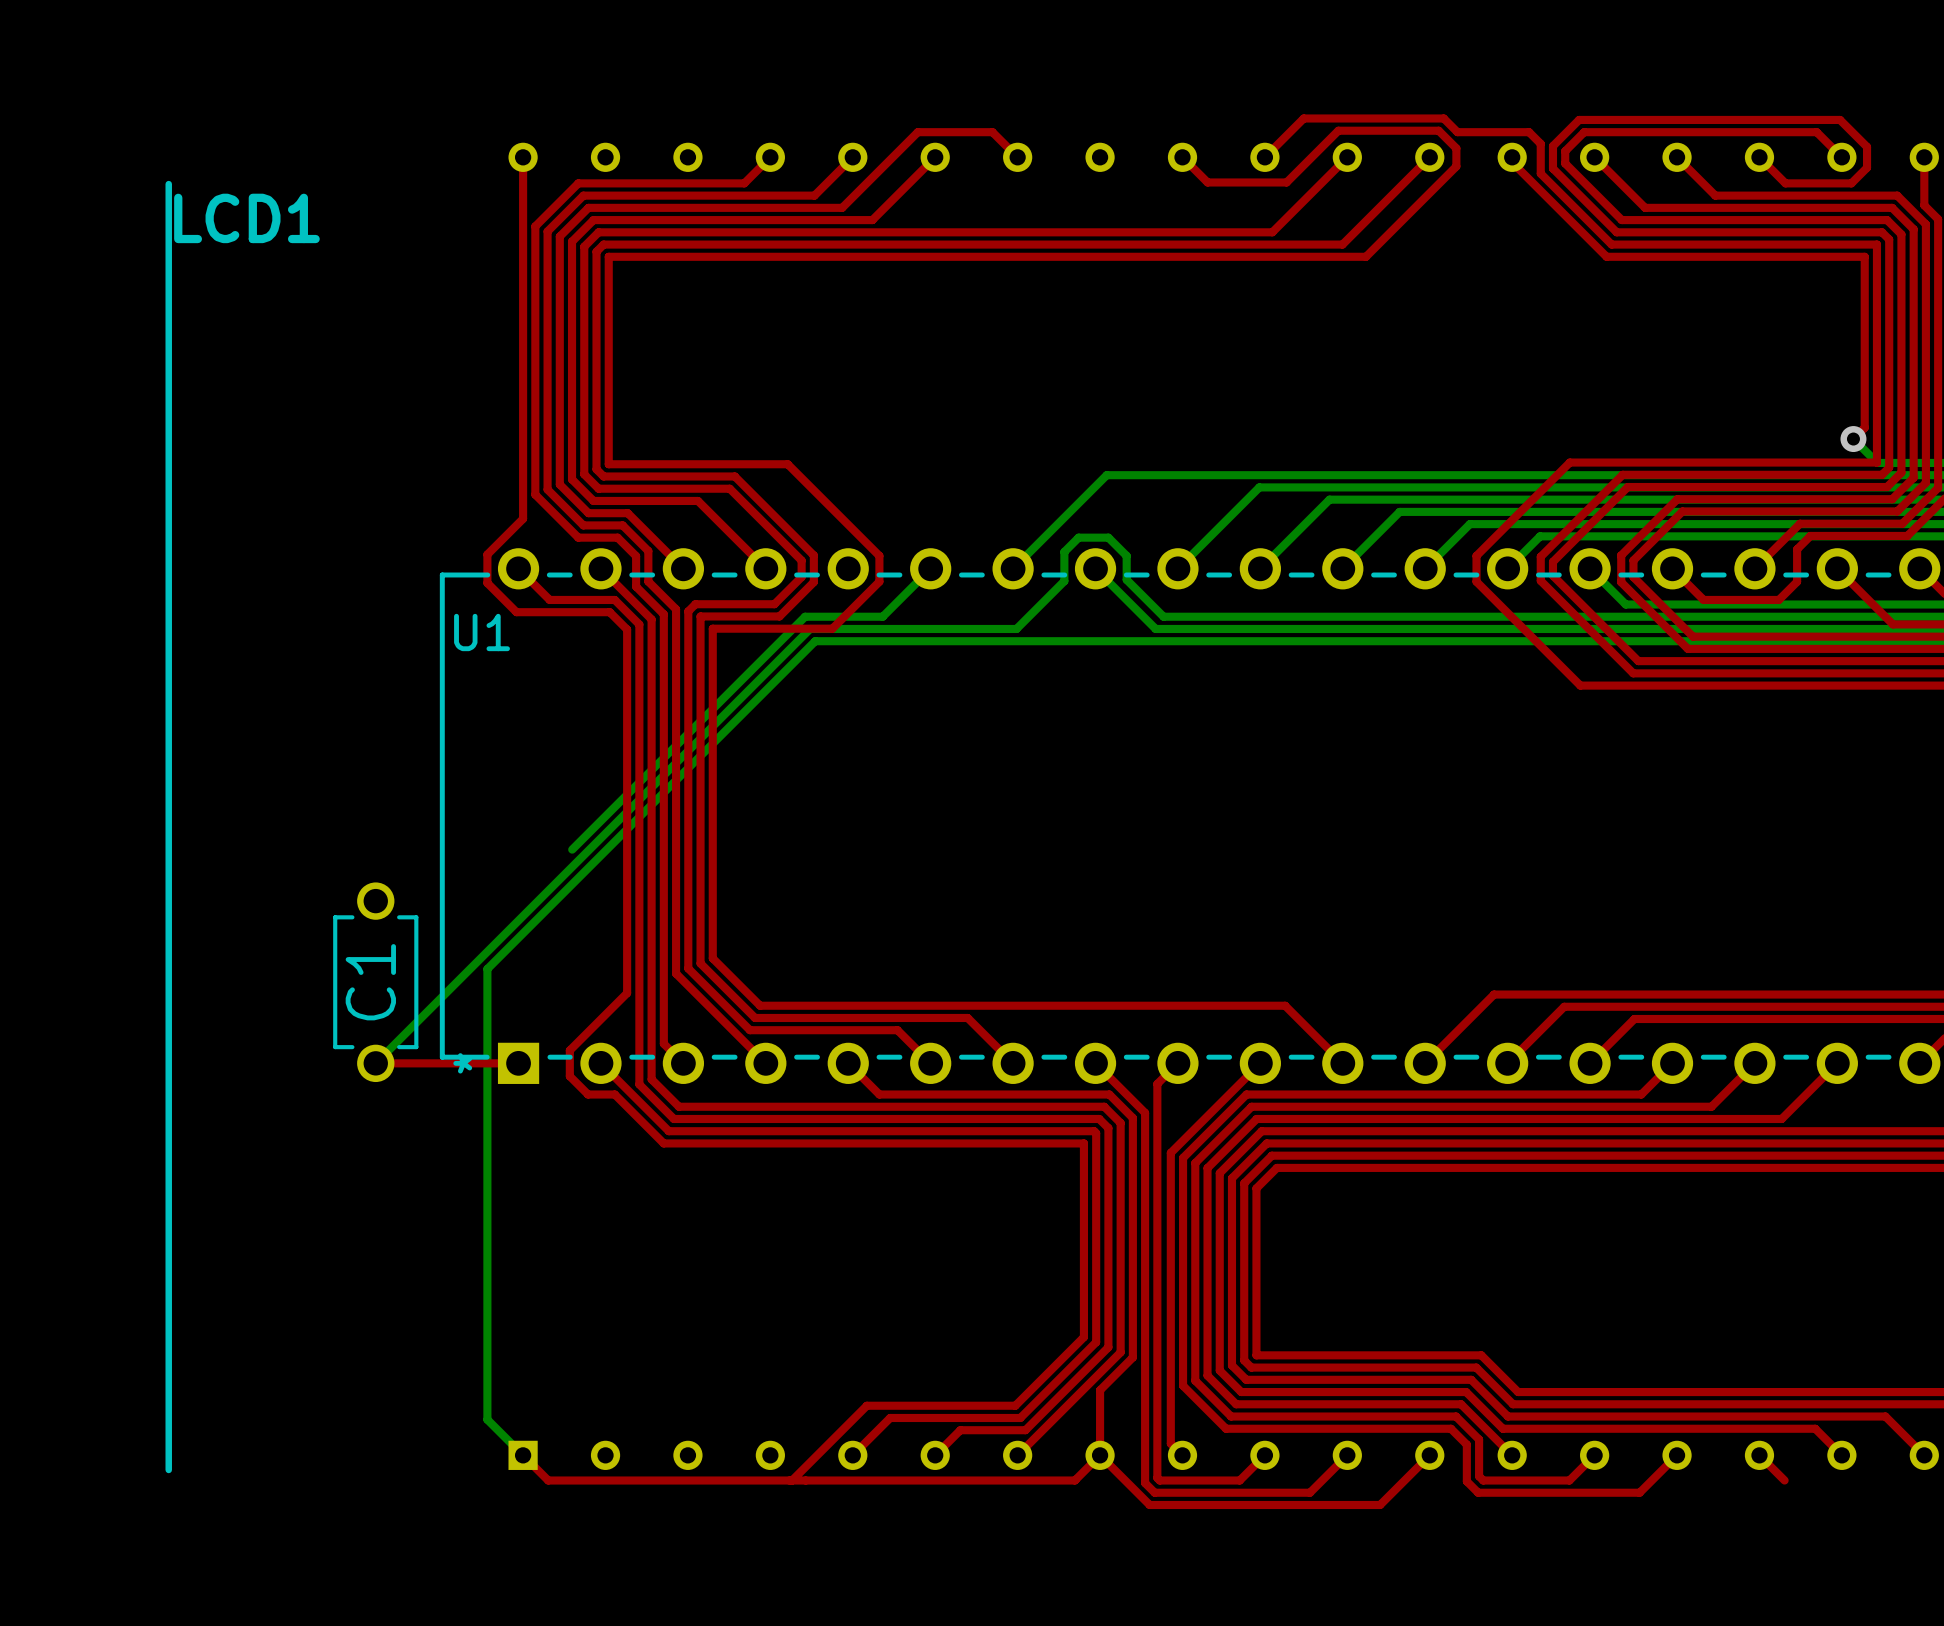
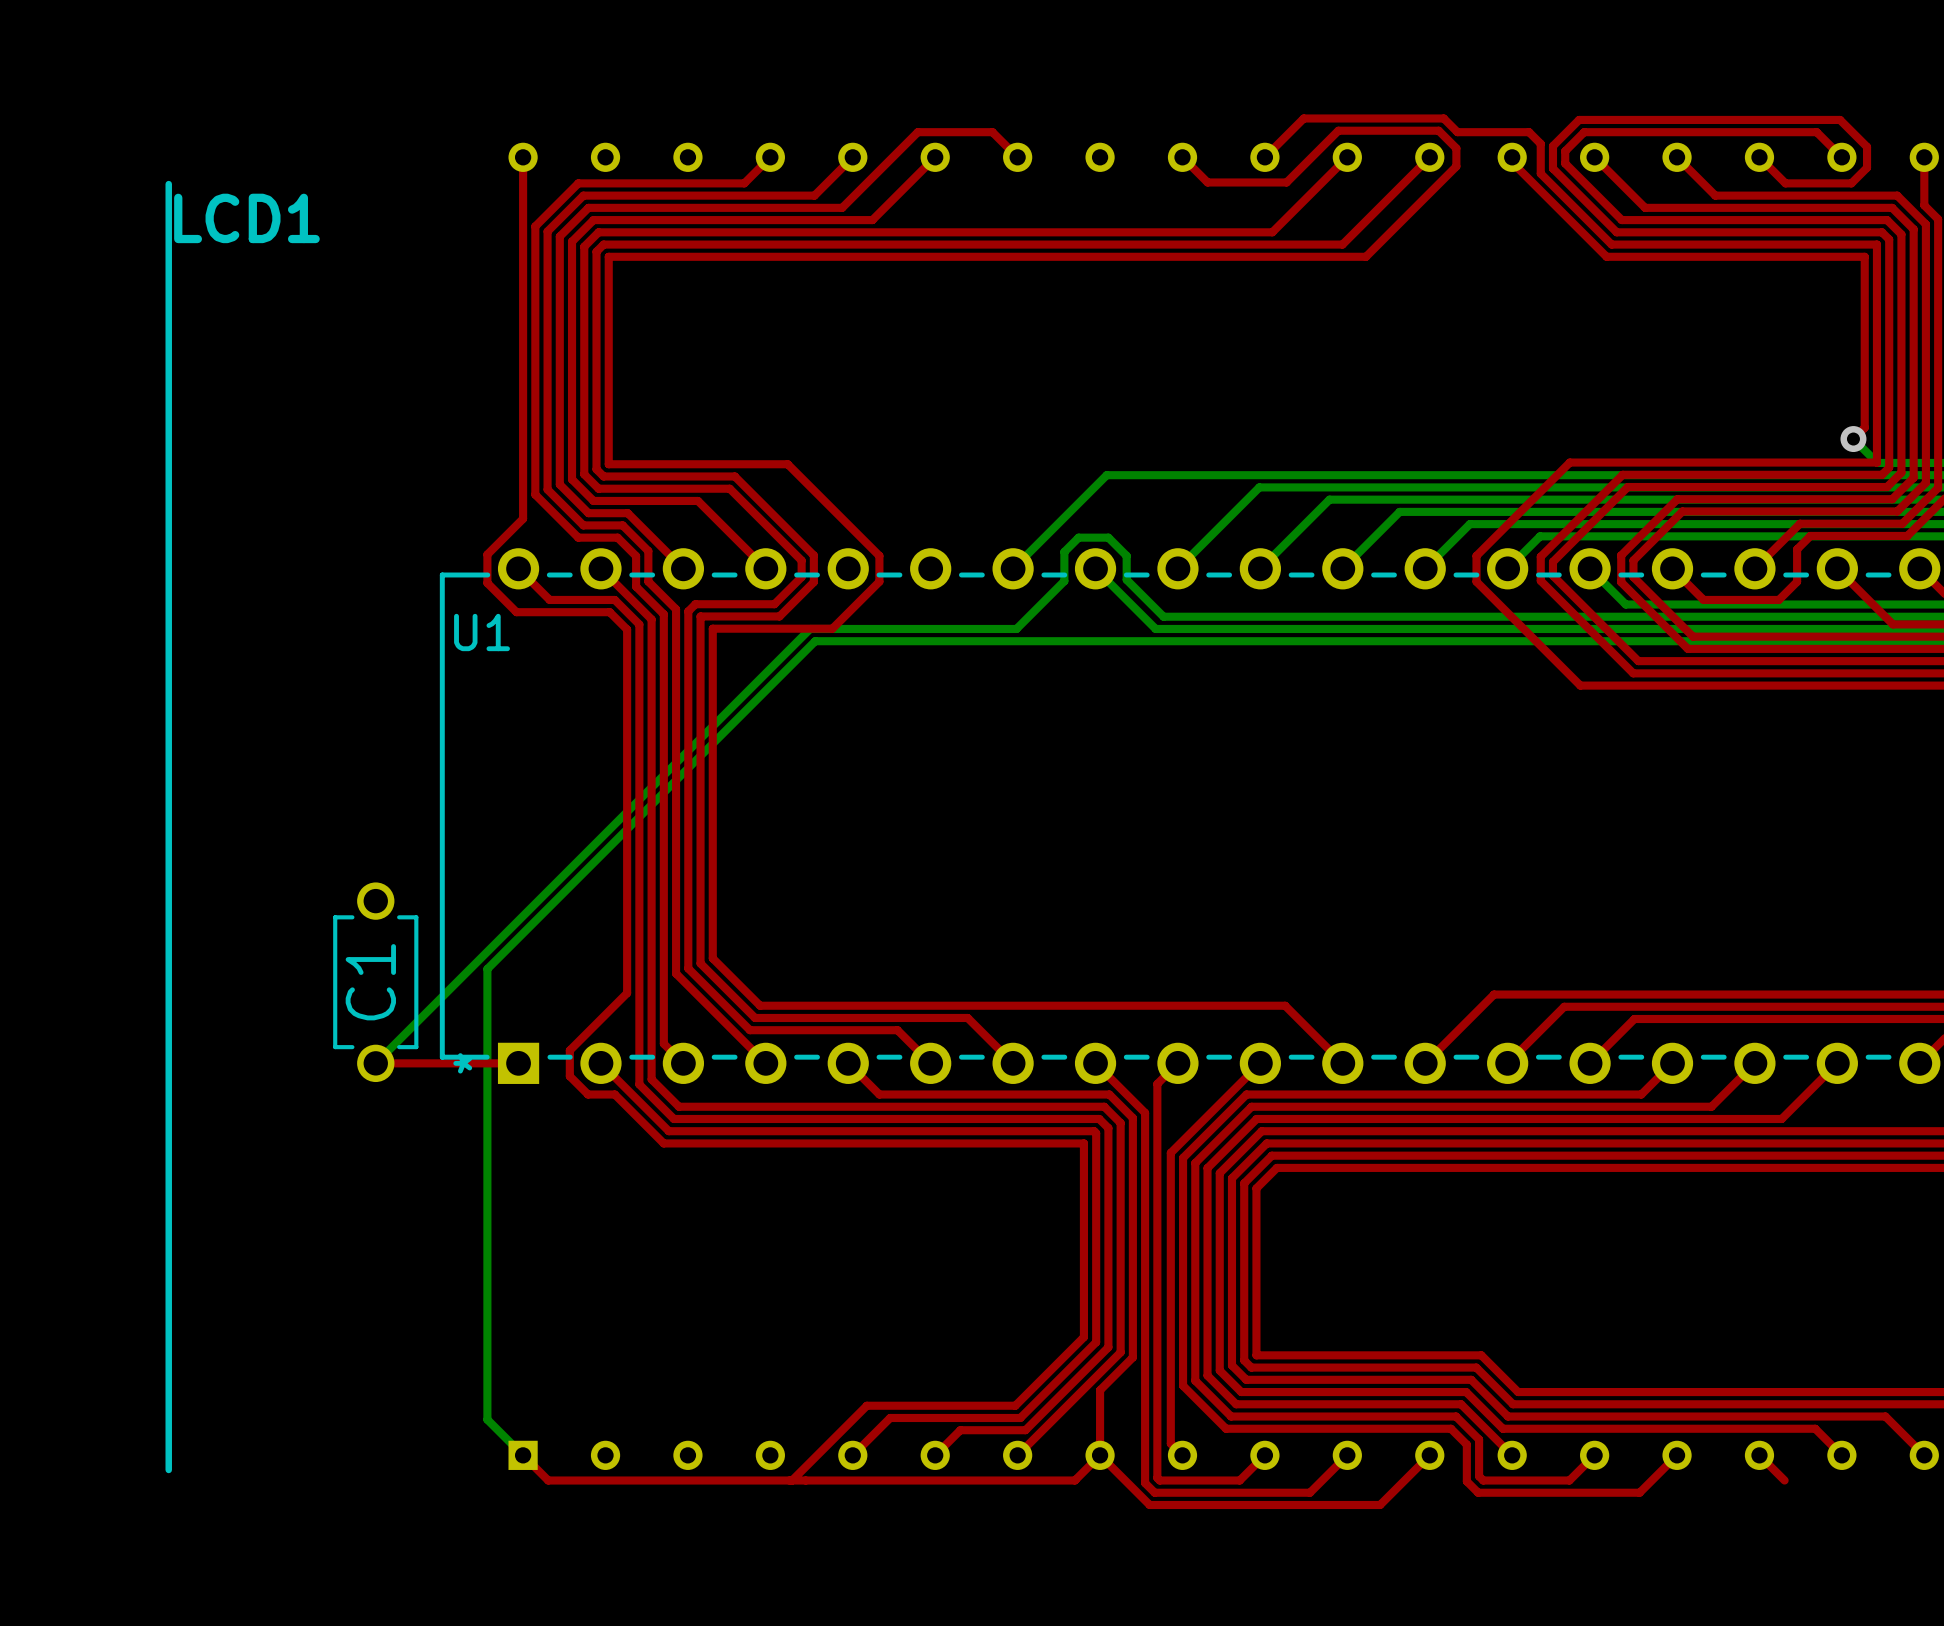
bottom track: (930, 568) (882, 616) (805, 616) (572, 849) -> none

